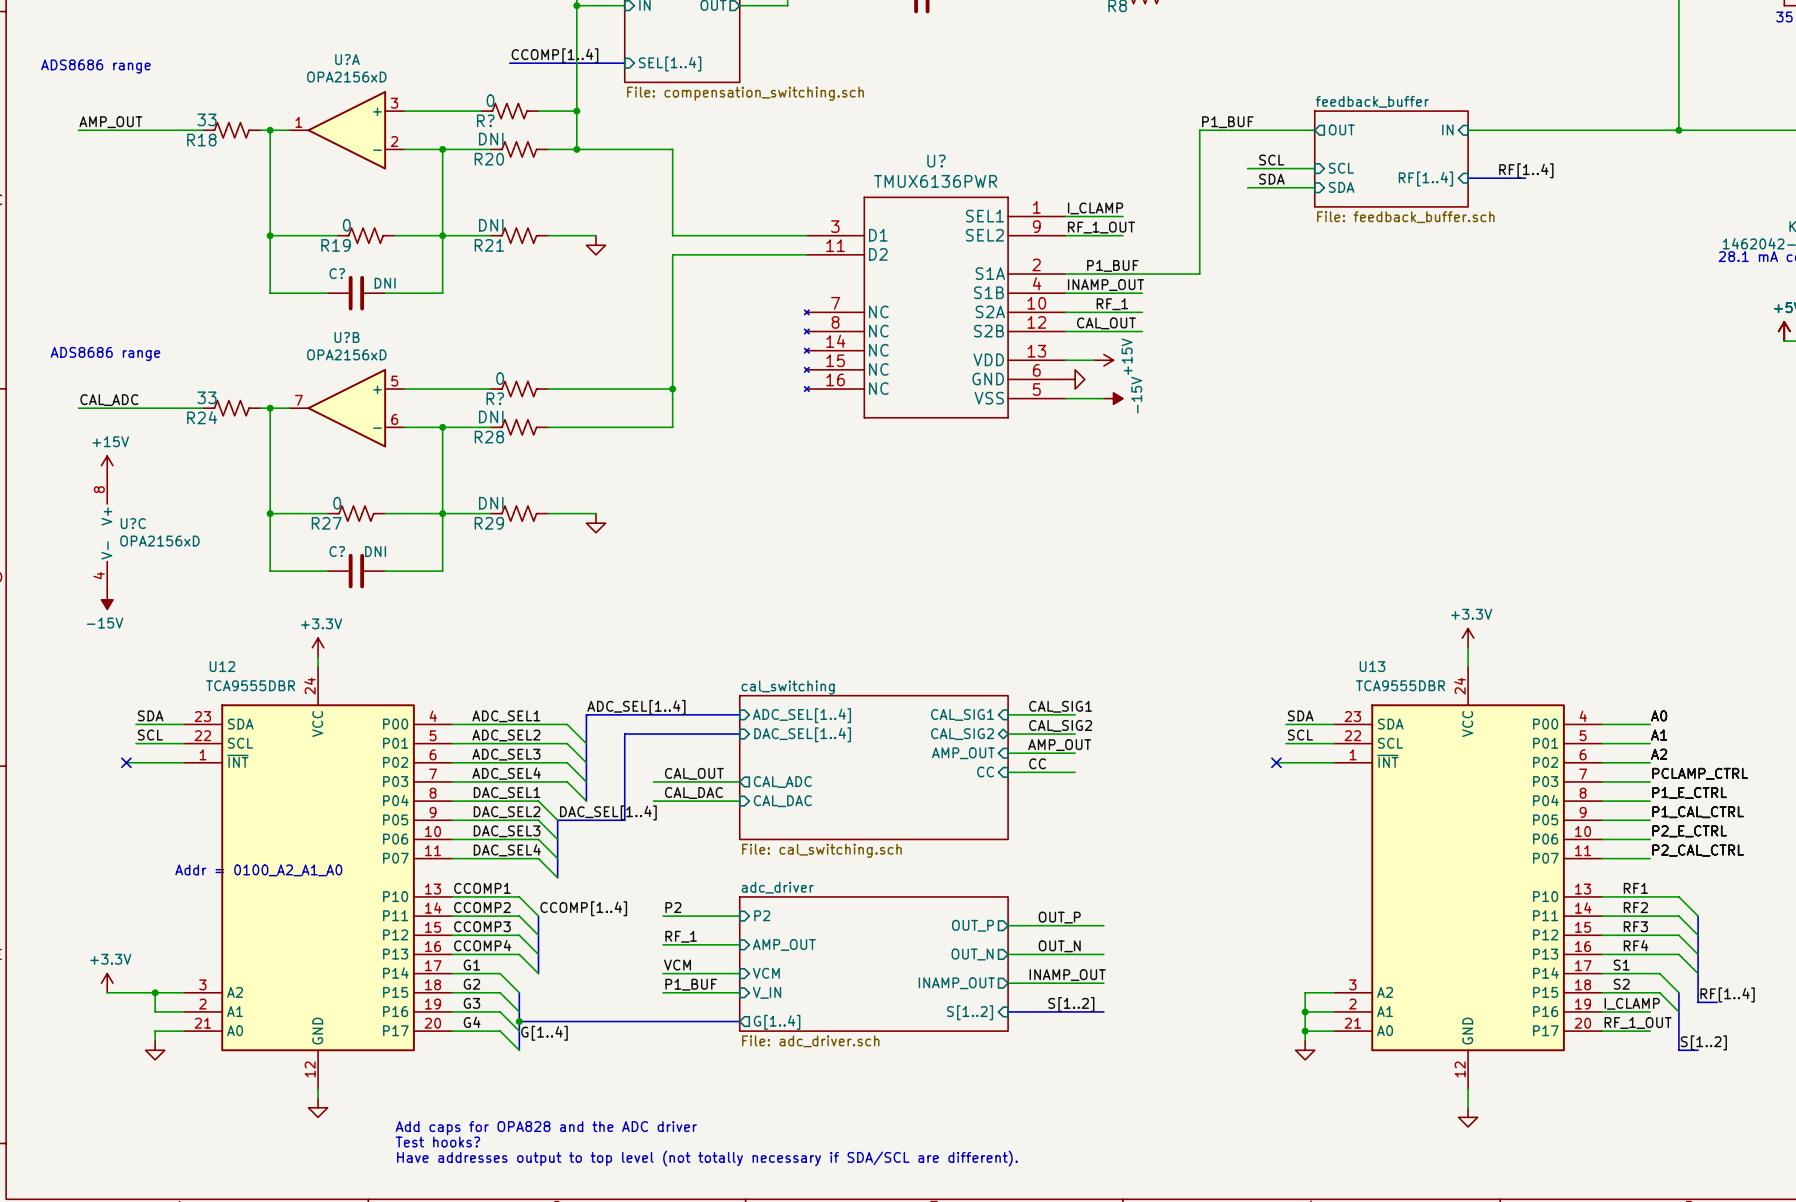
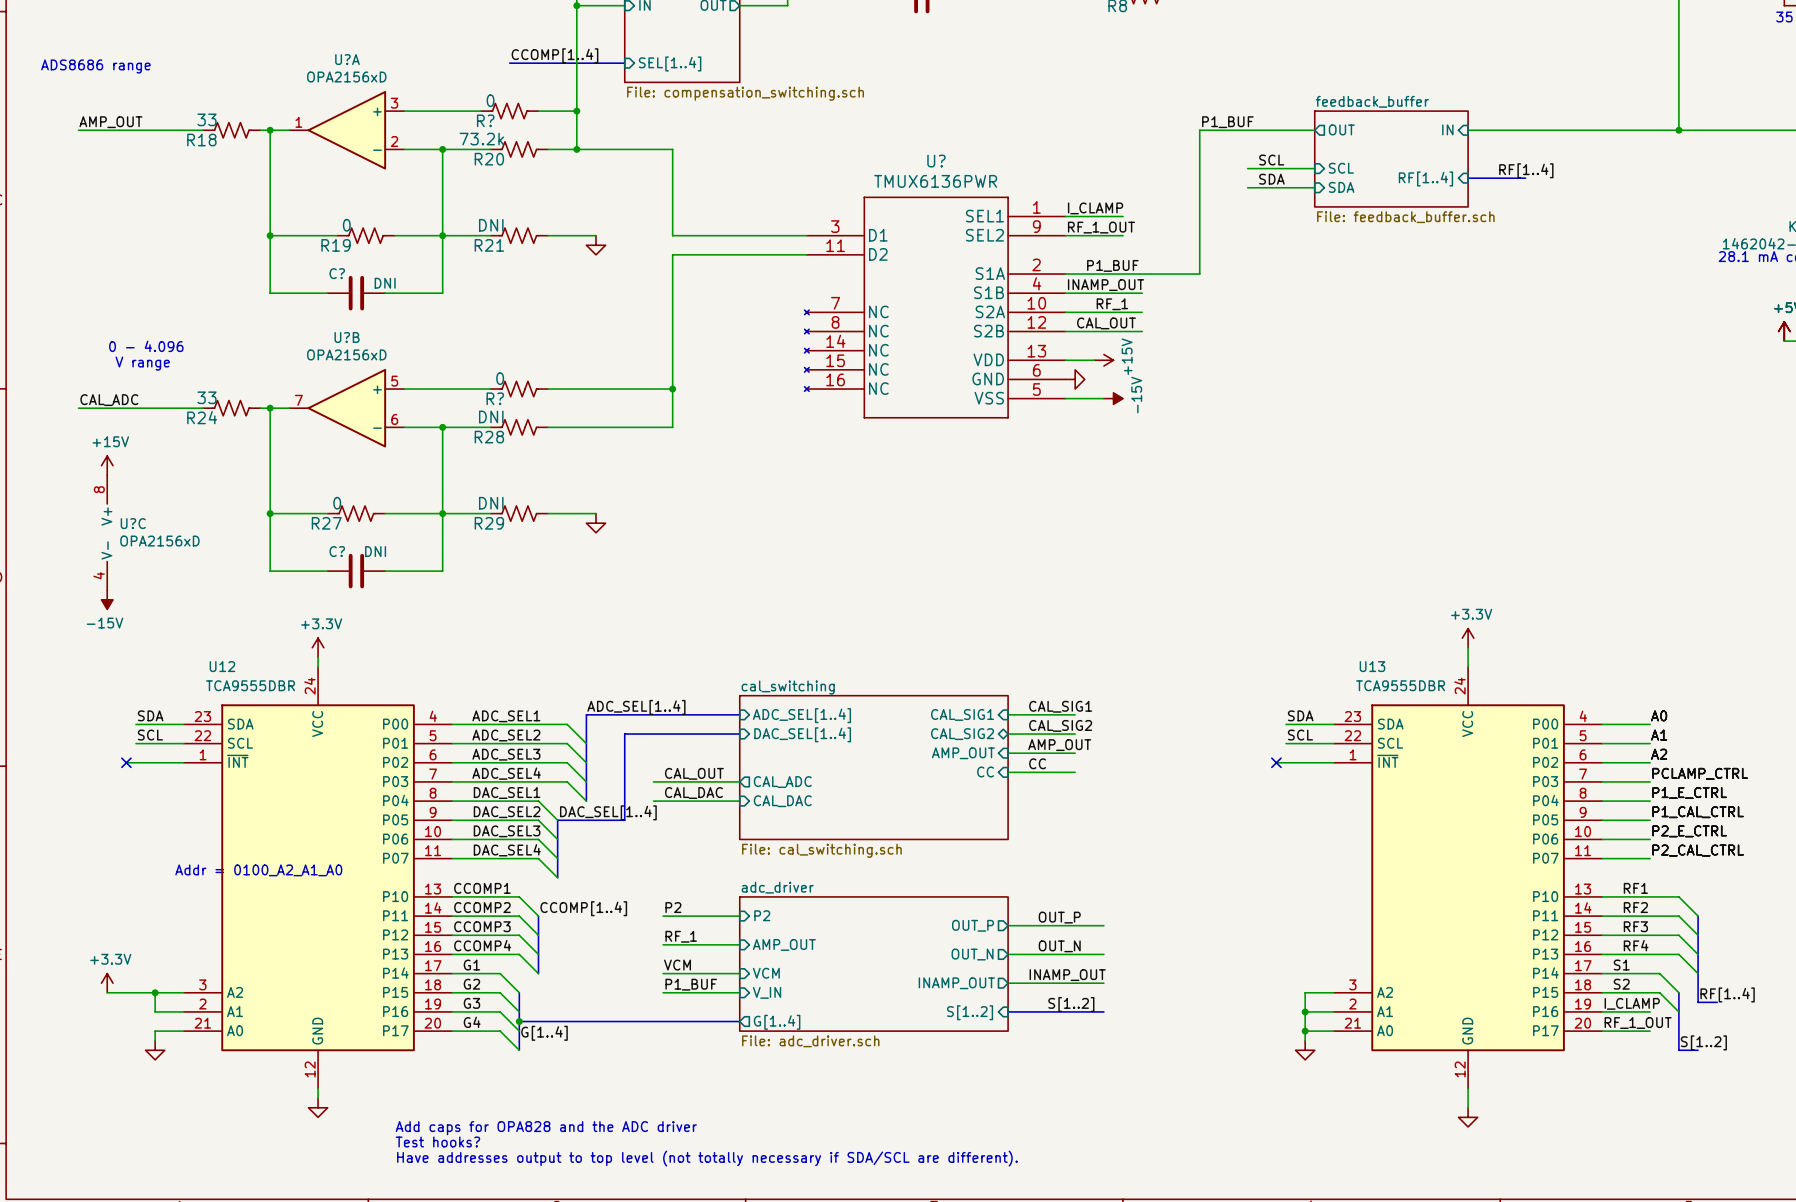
R20 value: DNI (491, 139) -> 73.2k (481, 139)
text: none -> 0 - 4.096 (146, 346)
text: ADS8686 range (105, 354) -> none
text: none -> V range (142, 363)

